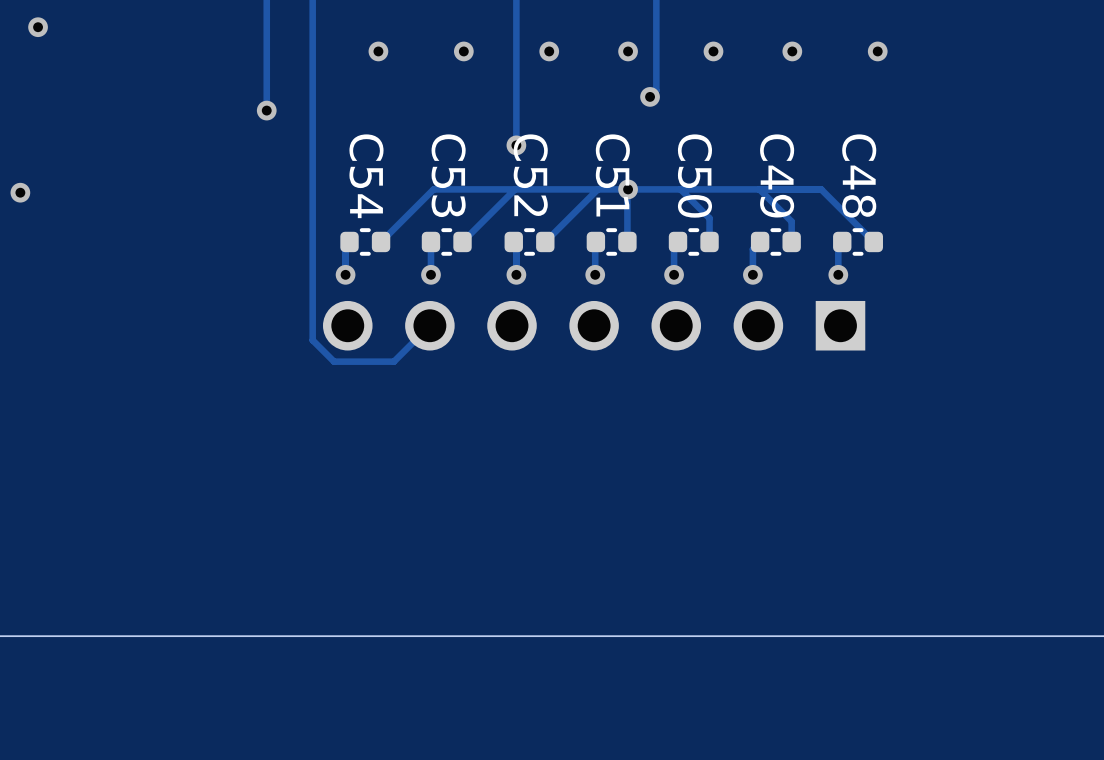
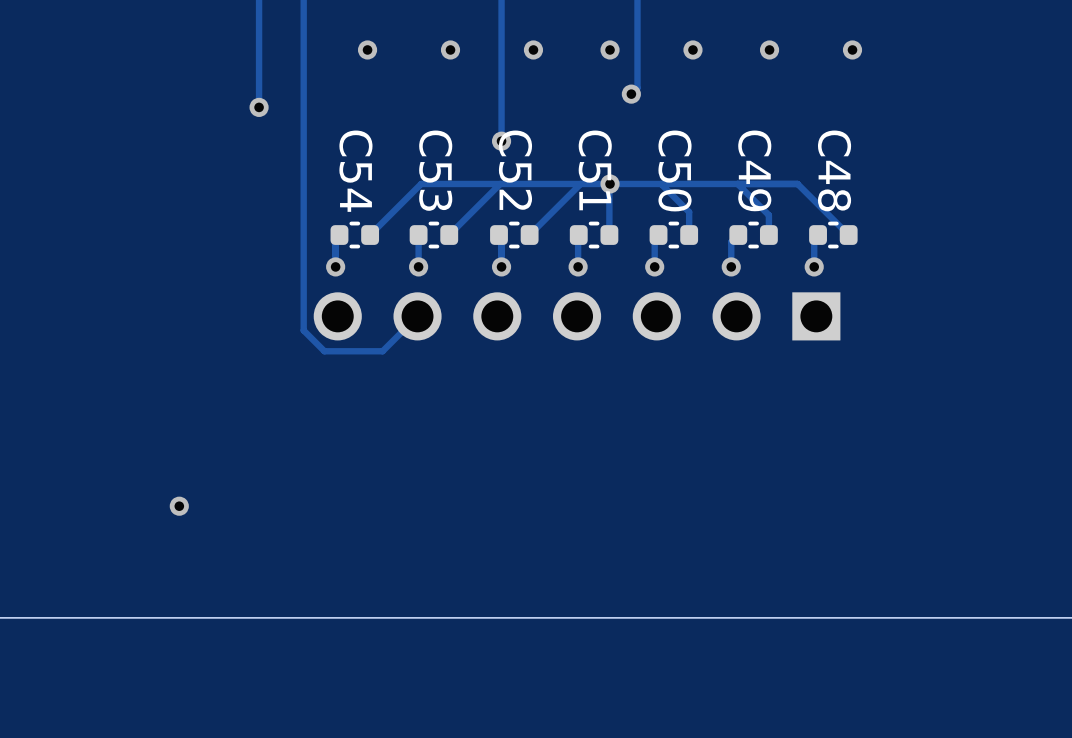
via: (38, 27) -> none
via: (20, 192) -> none
via: none -> (179, 506)

